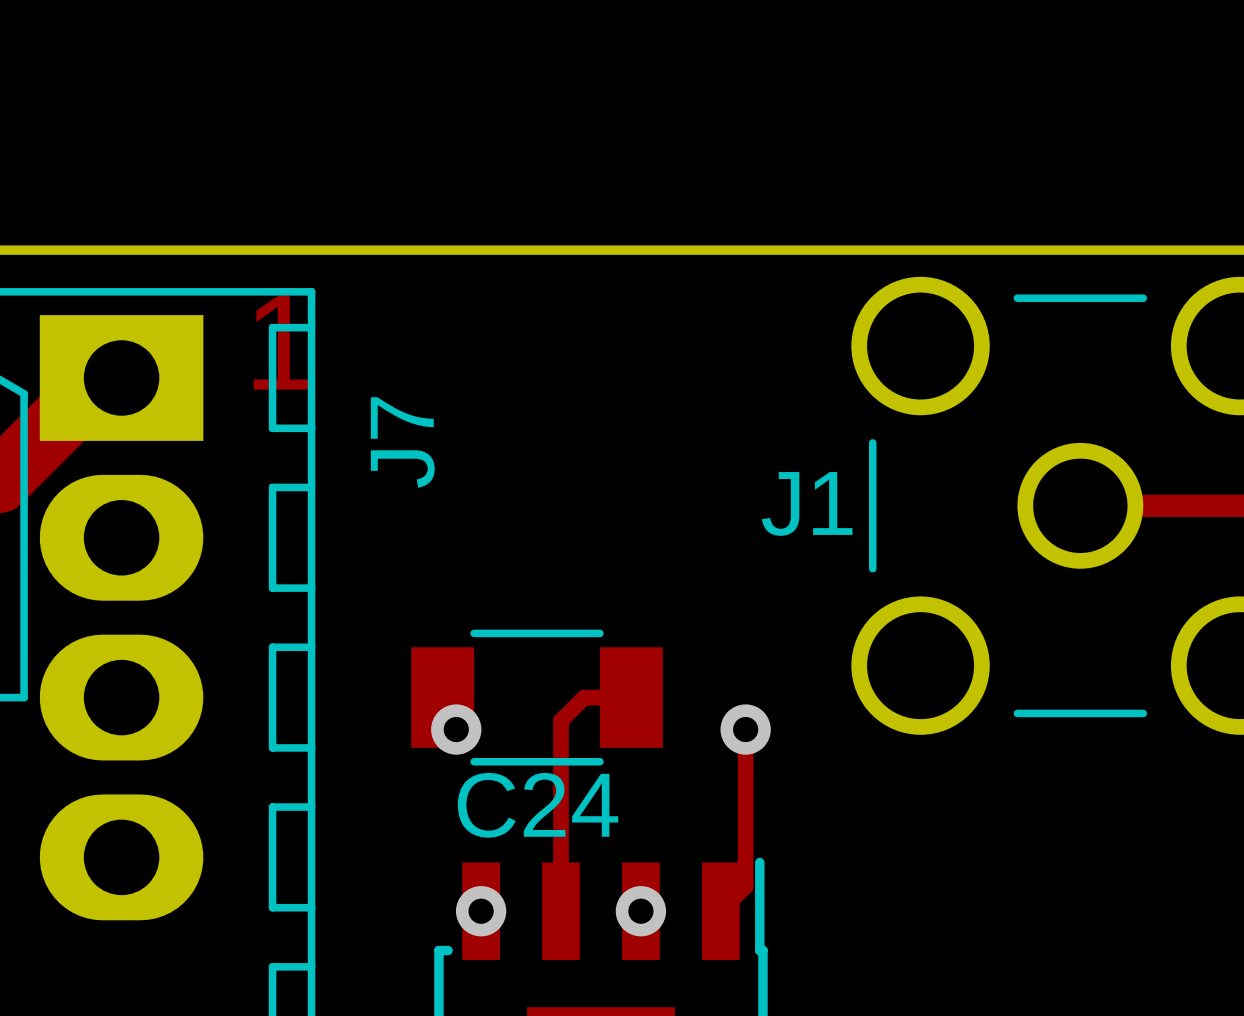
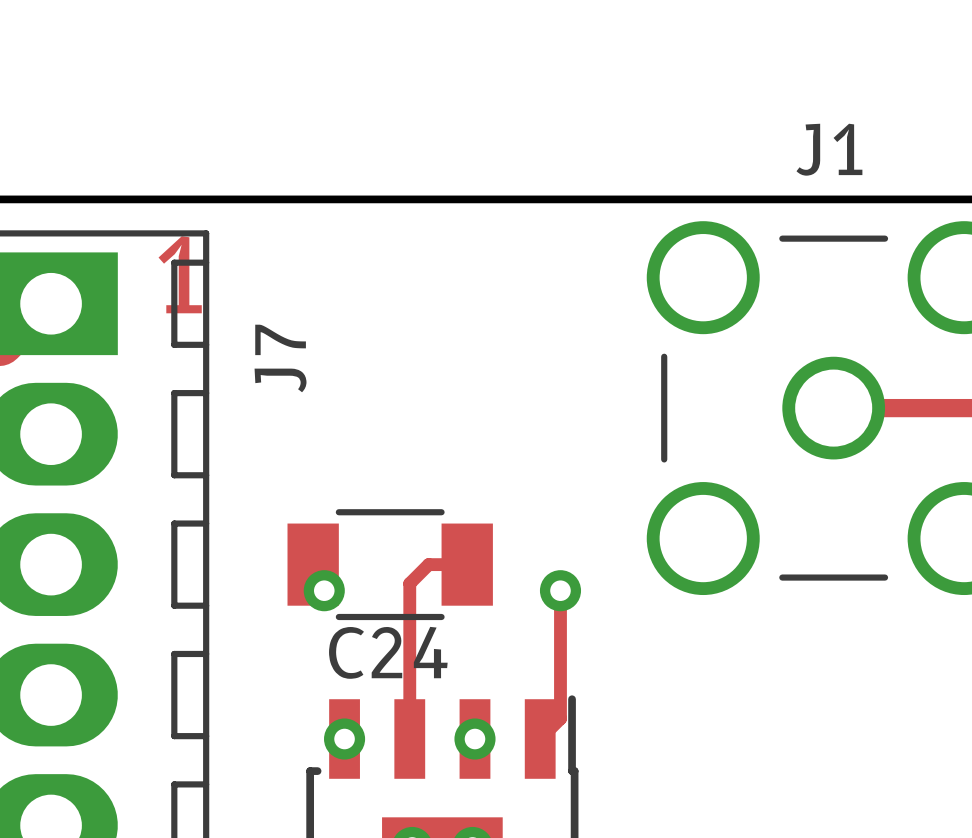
J1 name position: J1 (807, 503) -> J1 (829, 149)

